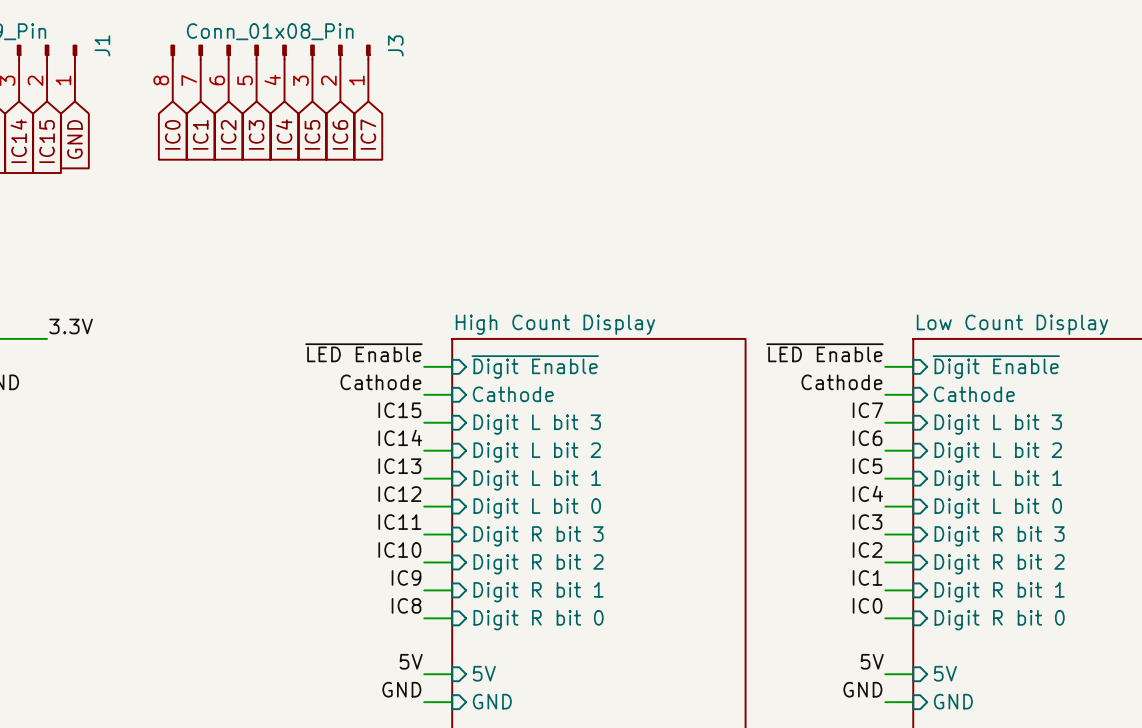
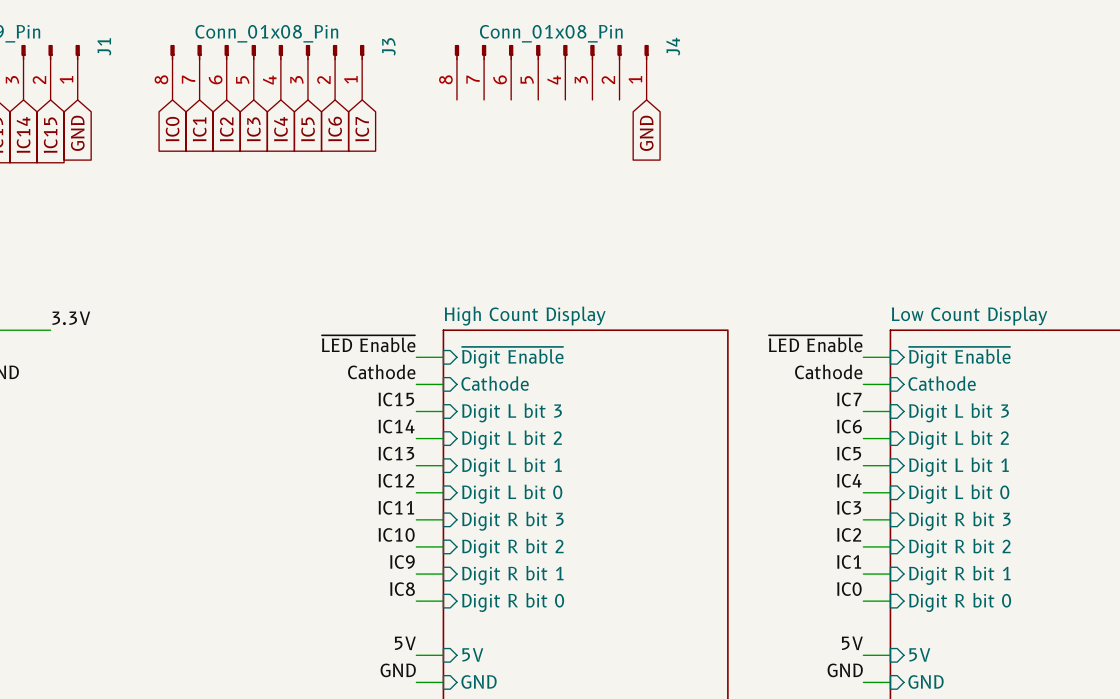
J4: none -> Conn_01x08_Pin (551, 72)
global label: none -> GND (646, 133)

